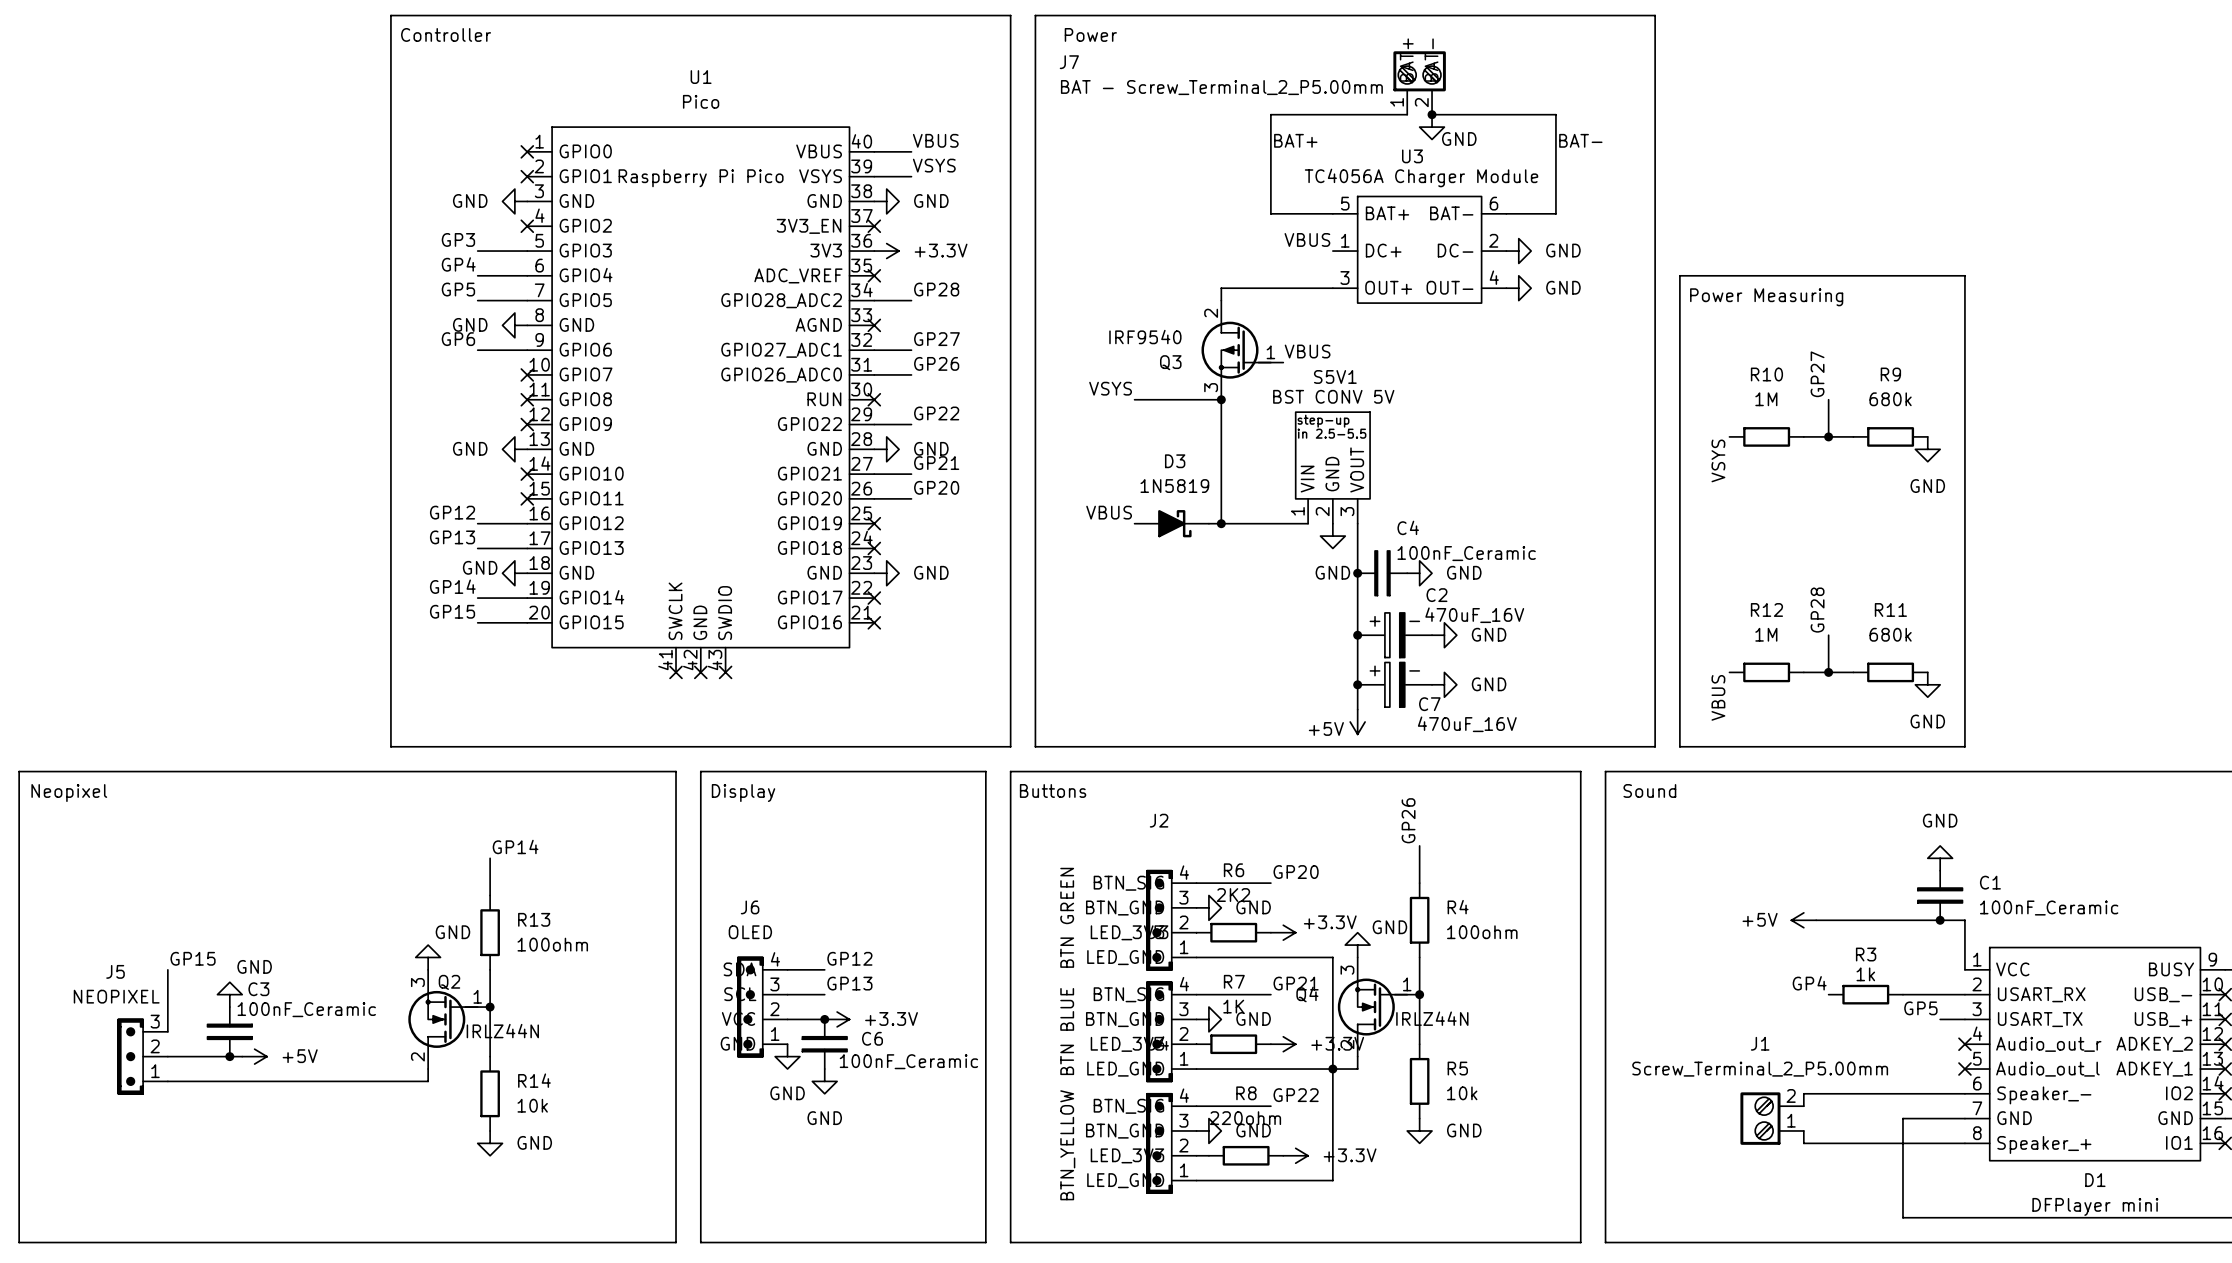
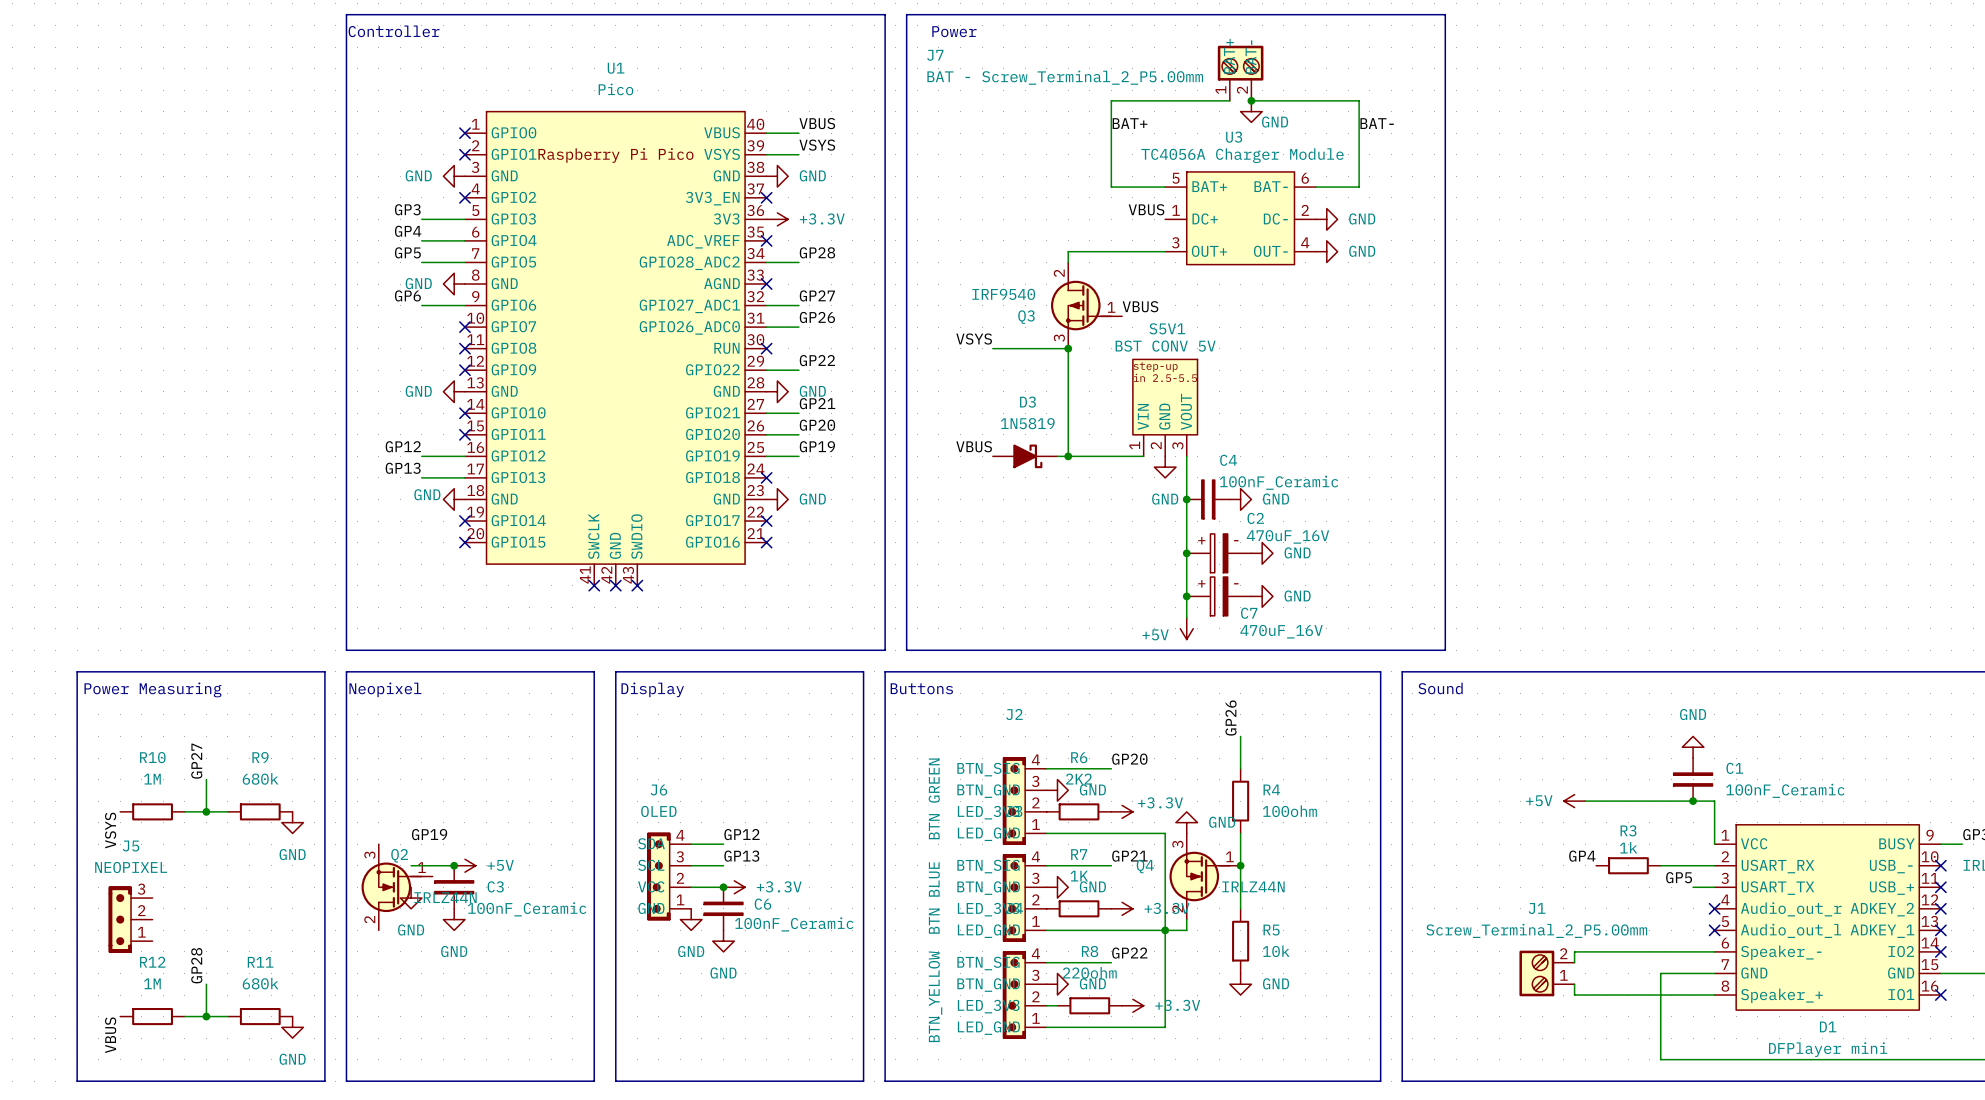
line: (1679, 275) (1964, 275) (1964, 746) (1679, 746) (1679, 275) -> none
text: Power Measuring (1766, 297) -> none
label: GP27 (1817, 374) -> none
wire: (1828, 399) (1828, 436) -> none
R10 position: (1766, 436) -> (152, 811)
wire: (1803, 436) (1853, 436) -> none
junction: (1828, 436) -> none
R9 position: (1890, 436) -> (260, 811)
power symbol: GND (1927, 449) -> none
label: VSYS (1718, 460) -> none
label: none -> GP19 (817, 446)
wire: none -> (766, 456) (798, 456)
no-connect mark: (874, 523) -> none
label: GP14 (452, 586) -> none
wire: (477, 598) (527, 598) -> none
no-connect mark: none -> (464, 521)
label: GP28 (1817, 610) -> none
label: GP15 (452, 611) -> none
wire: (477, 622) (527, 622) -> none
no-connect mark: none -> (464, 542)
wire: (1828, 635) (1828, 672) -> none
R12 position: (1766, 672) -> (152, 1016)
wire: (1803, 672) (1853, 672) -> none
junction: (1828, 672) -> none
R11 position: (1890, 672) -> (260, 1016)
power symbol: GND (1927, 684) -> none
label: VBUS (1718, 697) -> none
line: (81, 771) (19, 771) (19, 1242) (81, 1242) -> (77, 671) (77, 1081)
line: (366, 771) (390, 771) -> (324, 671) (324, 1081)
text: Neopixel (69, 793) -> none
text: none -> Power Measuring (152, 689)
text: none -> Neopixel (385, 689)
label: GP14 (515, 846) -> none
wire: (490, 858) (490, 895) -> none
label: none -> GP27 (196, 761)
wire: none -> (206, 779) (206, 811)
power symbol text position: GND (1389, 927) -> GND (1222, 822)
wire: none -> (184, 811) (227, 811)
junction: none -> (206, 811)
R13: 100ohm (490, 932) -> none
power symbol: none -> GND (292, 822)
label: none -> VSYS (110, 830)
power symbol: GND (428, 957) -> none
label: GP15 (193, 958) -> none
label: none -> GP19 (429, 834)
wire: (167, 969) (167, 1031) -> none
wire: (490, 969) (490, 1056) -> none
J5 name position: J5 (115, 971) -> J5 (131, 846)
C3 name position: C3 (258, 989) -> C3 (495, 886)
power symbol: GND (229, 994) -> none
wire: none -> (411, 865) (454, 865)
power symbol: none -> +5V (464, 865)
J5 value position: NEOPIXEL (116, 996) -> NEOPIXEL (131, 867)
junction position: (490, 1007) -> (454, 865)
C3 value position: 100nF_Ceramic (306, 1009) -> 100nF_Ceramic (527, 909)
C3 position: (229, 1031) -> (454, 887)
power symbol: none -> GND (411, 898)
wire: (167, 1056) (242, 1056) -> none
junction: (229, 1056) -> none
power symbol: +5V (254, 1056) -> none
power symbol: none -> GND (454, 919)
wire: (428, 1069) (428, 1081) (167, 1081) -> none
R14: 10k (490, 1093) -> none
label: none -> GP28 (196, 965)
wire: none -> (206, 984) (206, 1016)
power symbol: GND (490, 1143) -> none
wire: none -> (184, 1016) (227, 1016)
junction: none -> (206, 1016)
power symbol: none -> GND (292, 1027)
label: none -> VBUS (110, 1035)
line: (366, 1242) (390, 1242) -> (346, 671) (346, 1081)

